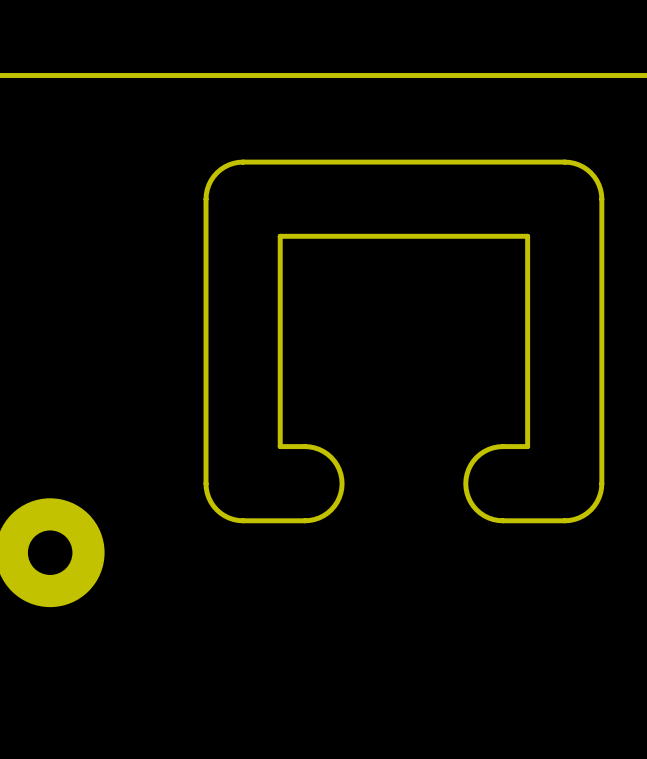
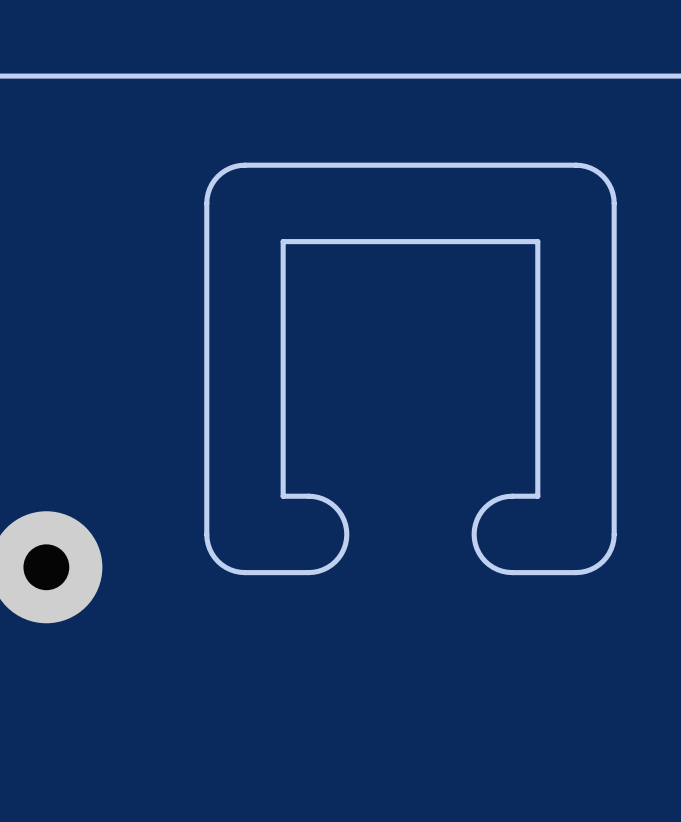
board edge: (280, 446) (314, 447) (327, 454) (337, 465) (341, 478) (340, 493) (334, 506) (323, 515) (304, 520) (233, 519) (224, 515) (213, 506) (208, 497) (206, 483) -> (283, 458) (283, 496) (313, 496) (323, 499) (335, 507) (343, 519) (346, 529) (345, 544) (338, 557) (327, 567) (308, 572) (244, 572) (225, 567) (214, 557) (208, 544) (206, 496)
board edge: (527, 446) (493, 447) (480, 454) (470, 465) (466, 478) (467, 493) (473, 506) (484, 515) (502, 520) (574, 519) (587, 513) (594, 506) (600, 493) (601, 483) -> (537, 458) (537, 496) (507, 496) (497, 499) (485, 507) (477, 519) (474, 529) (475, 544) (482, 557) (493, 567) (512, 572) (575, 572) (595, 567) (606, 557) (612, 544) (614, 496)

